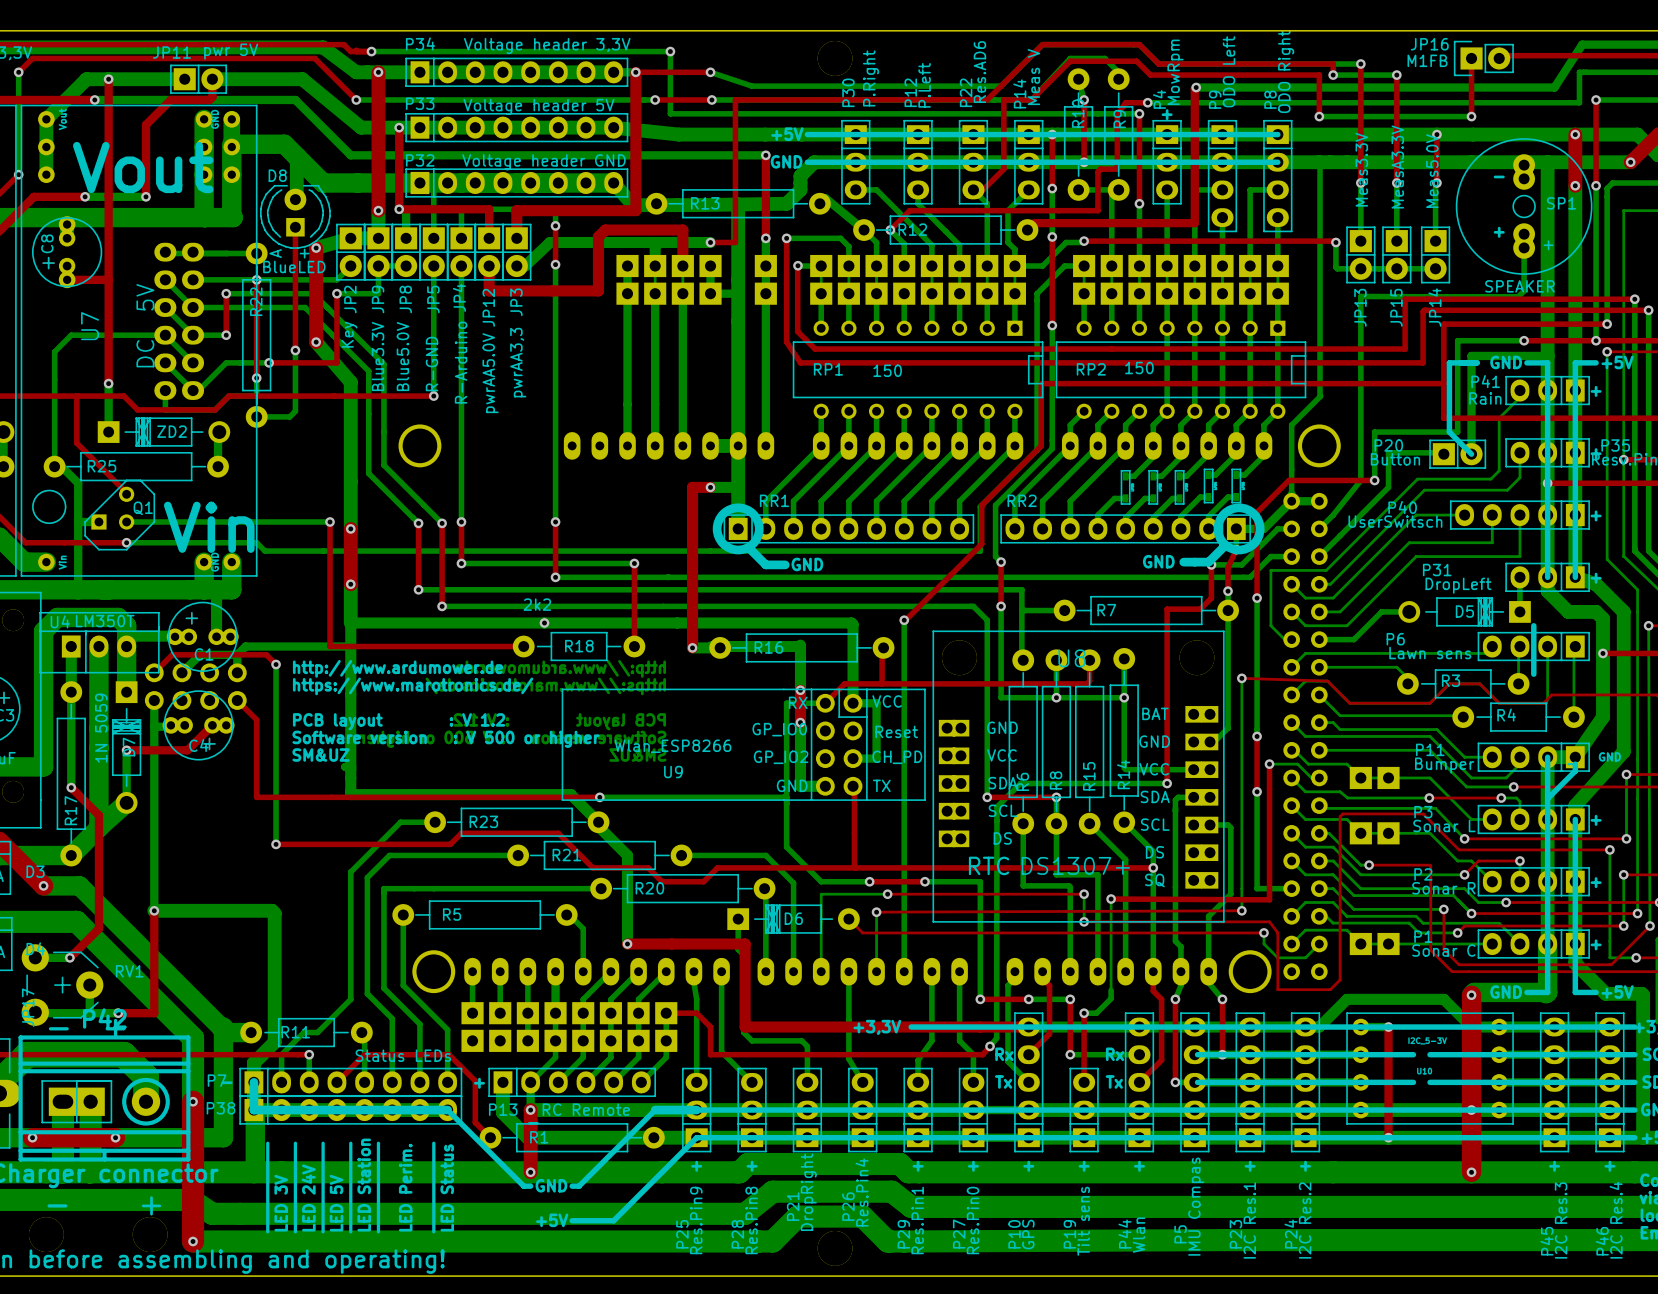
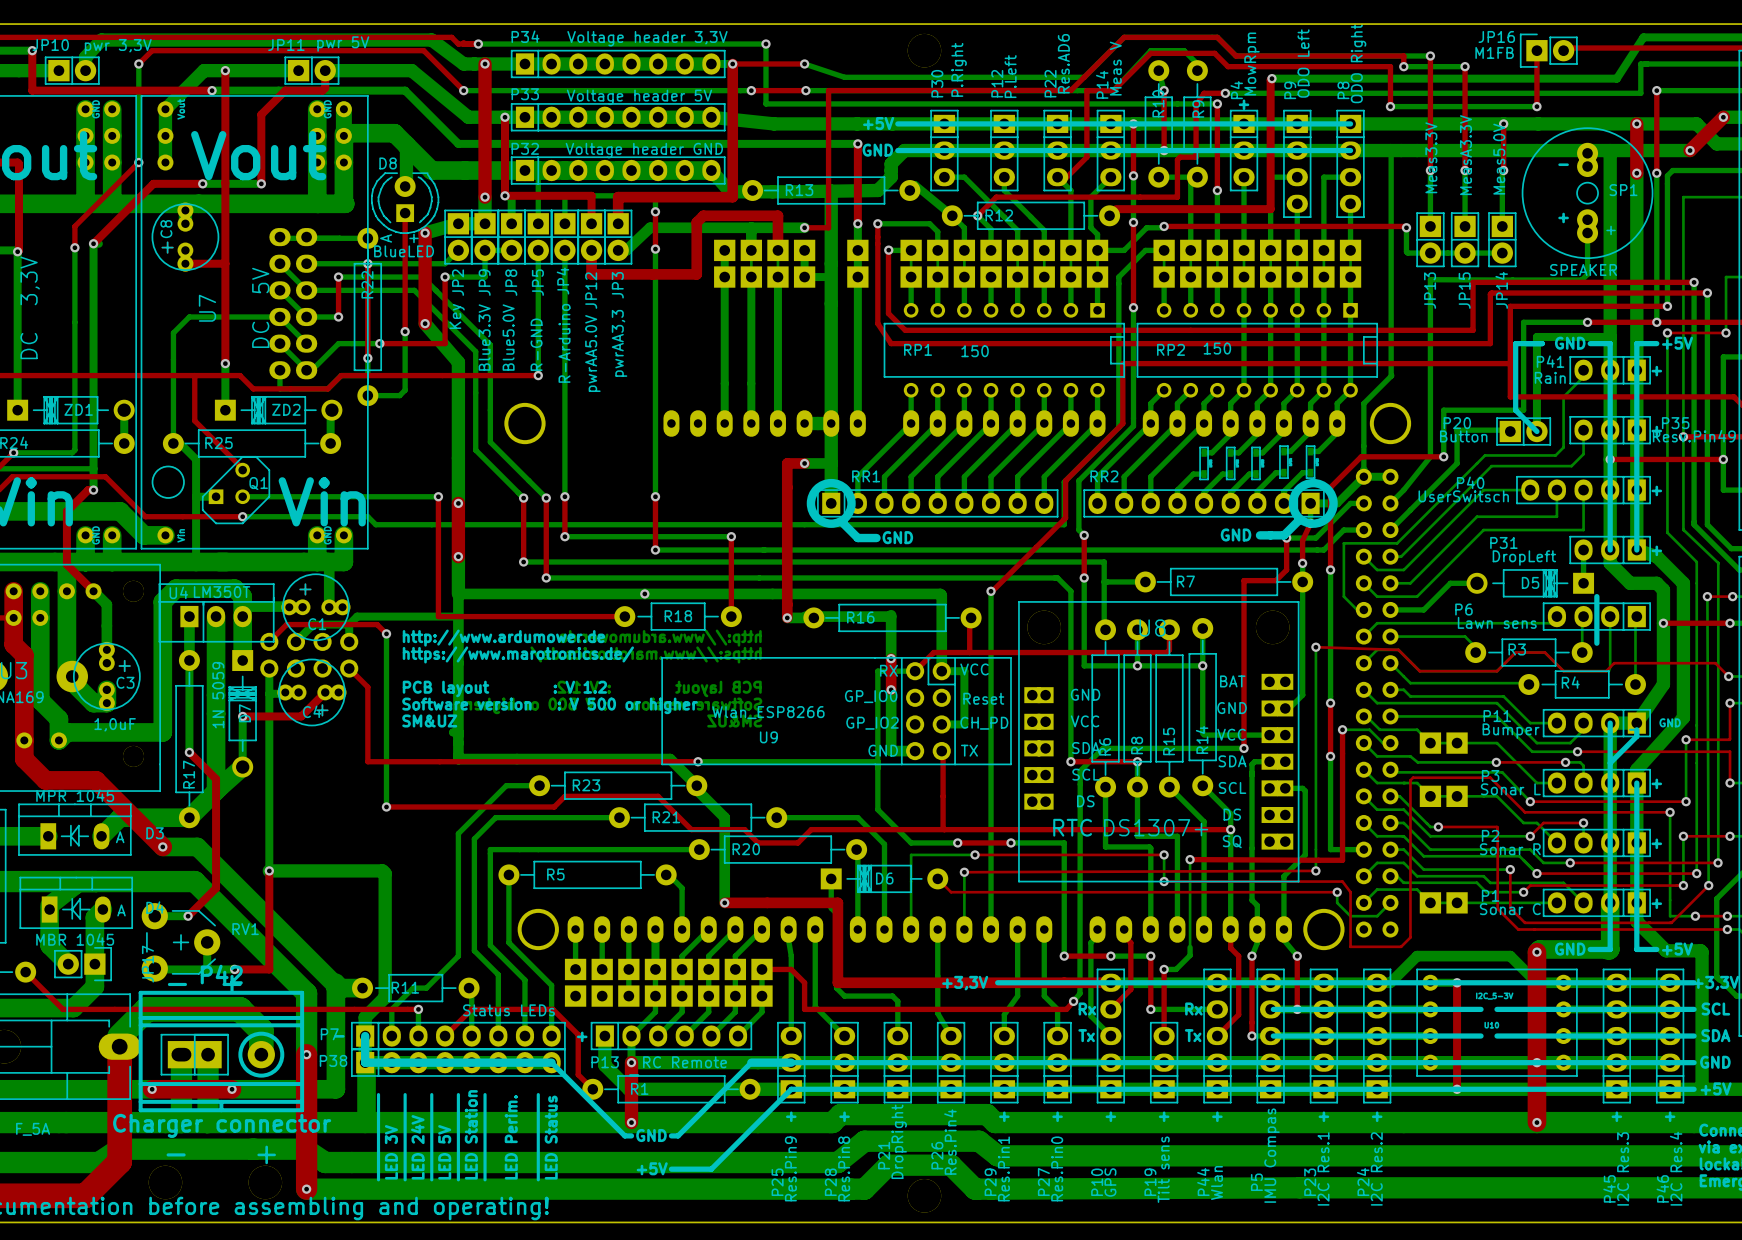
R18 value: 2k2 (537, 604) -> none

